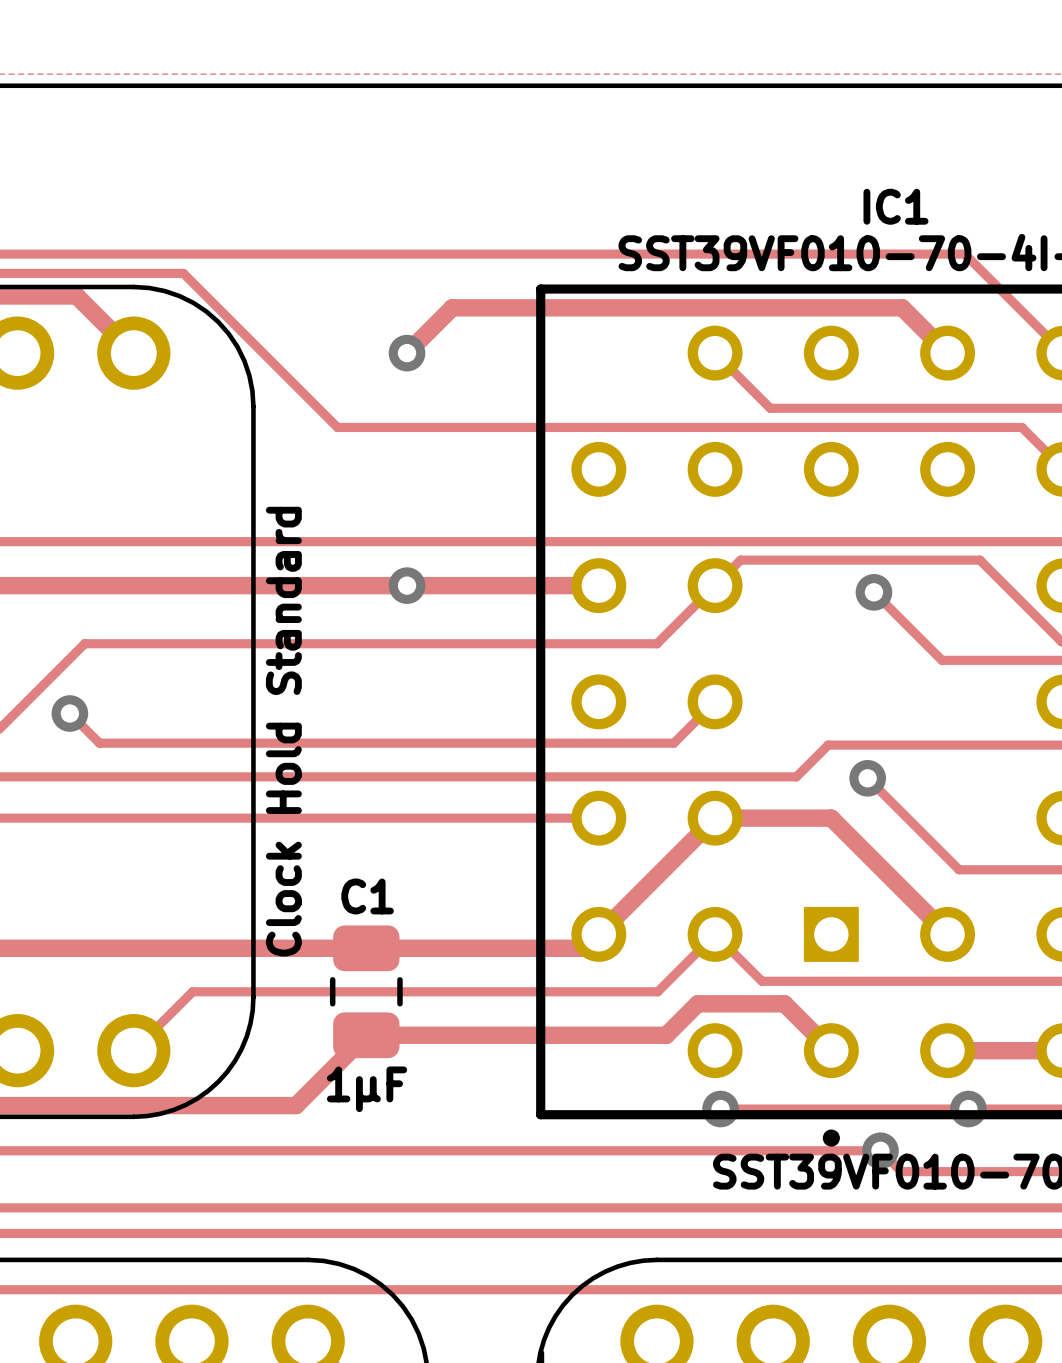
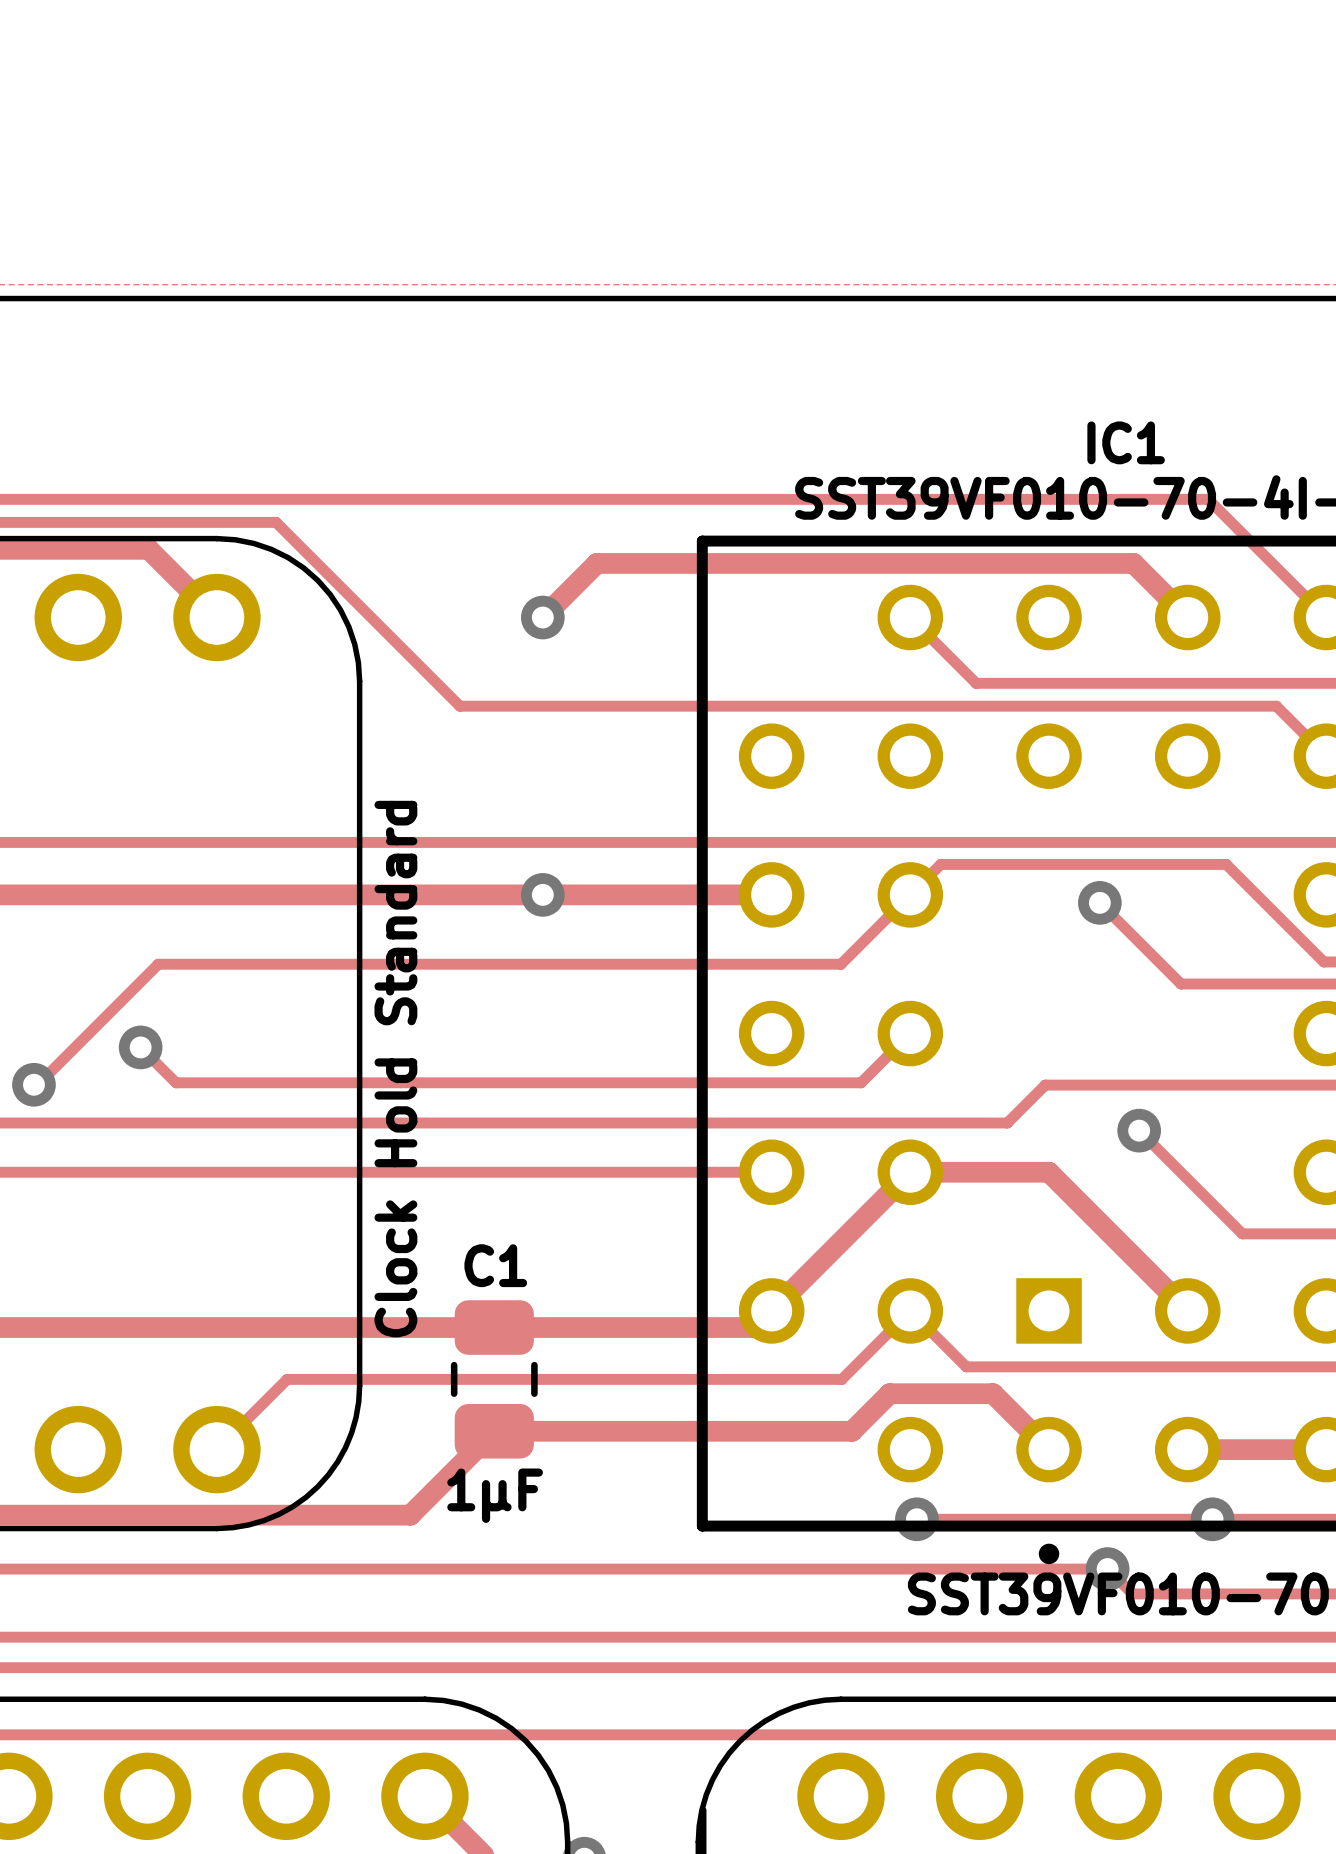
track: (867, 778) (959, 869) (993, 869) -> (1139, 1130) (1242, 1233)
via position: (867, 778) -> (1139, 1130)

